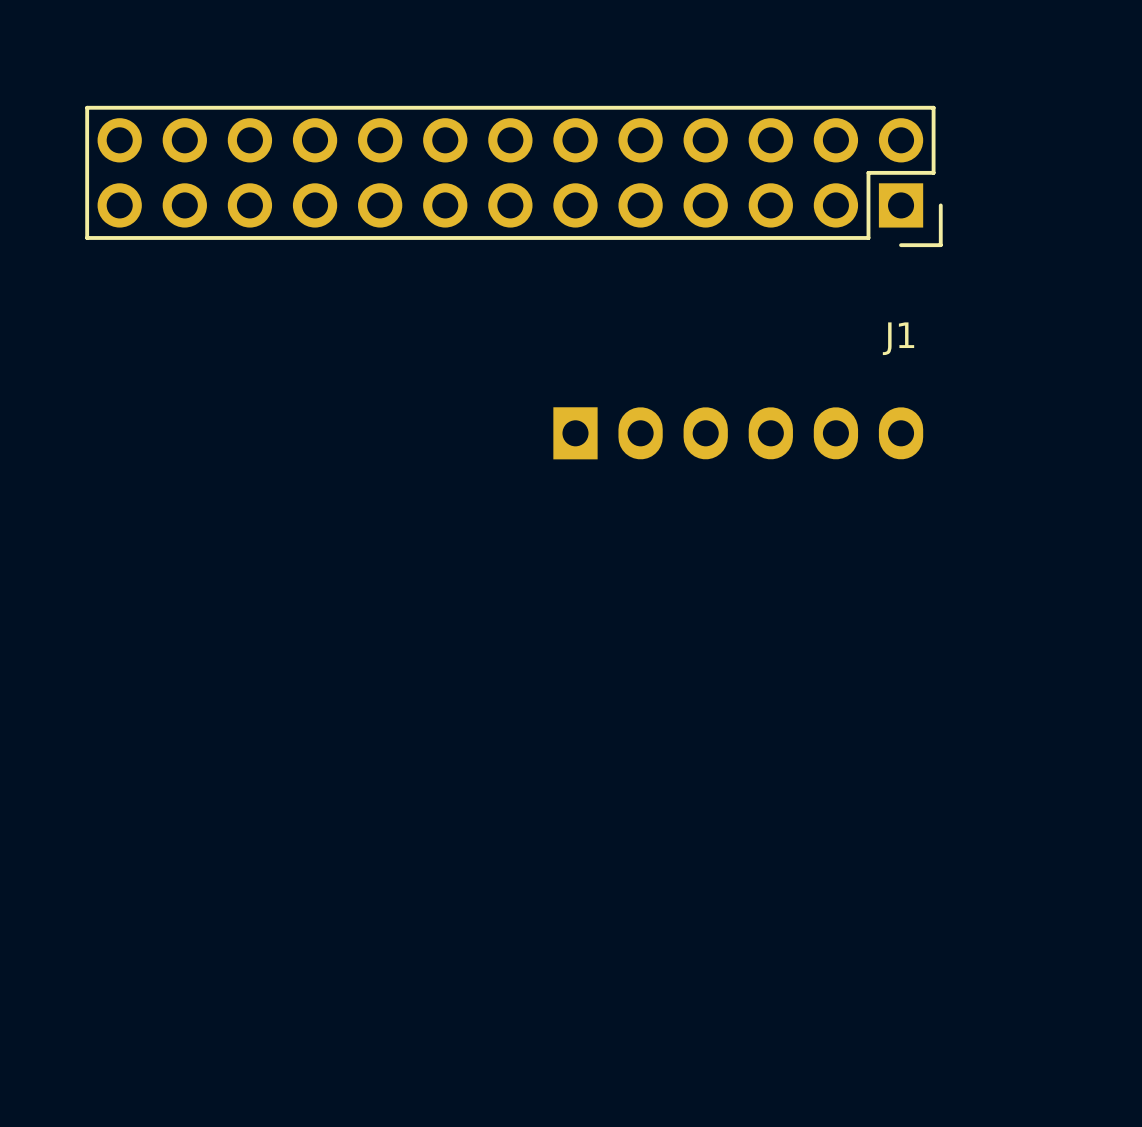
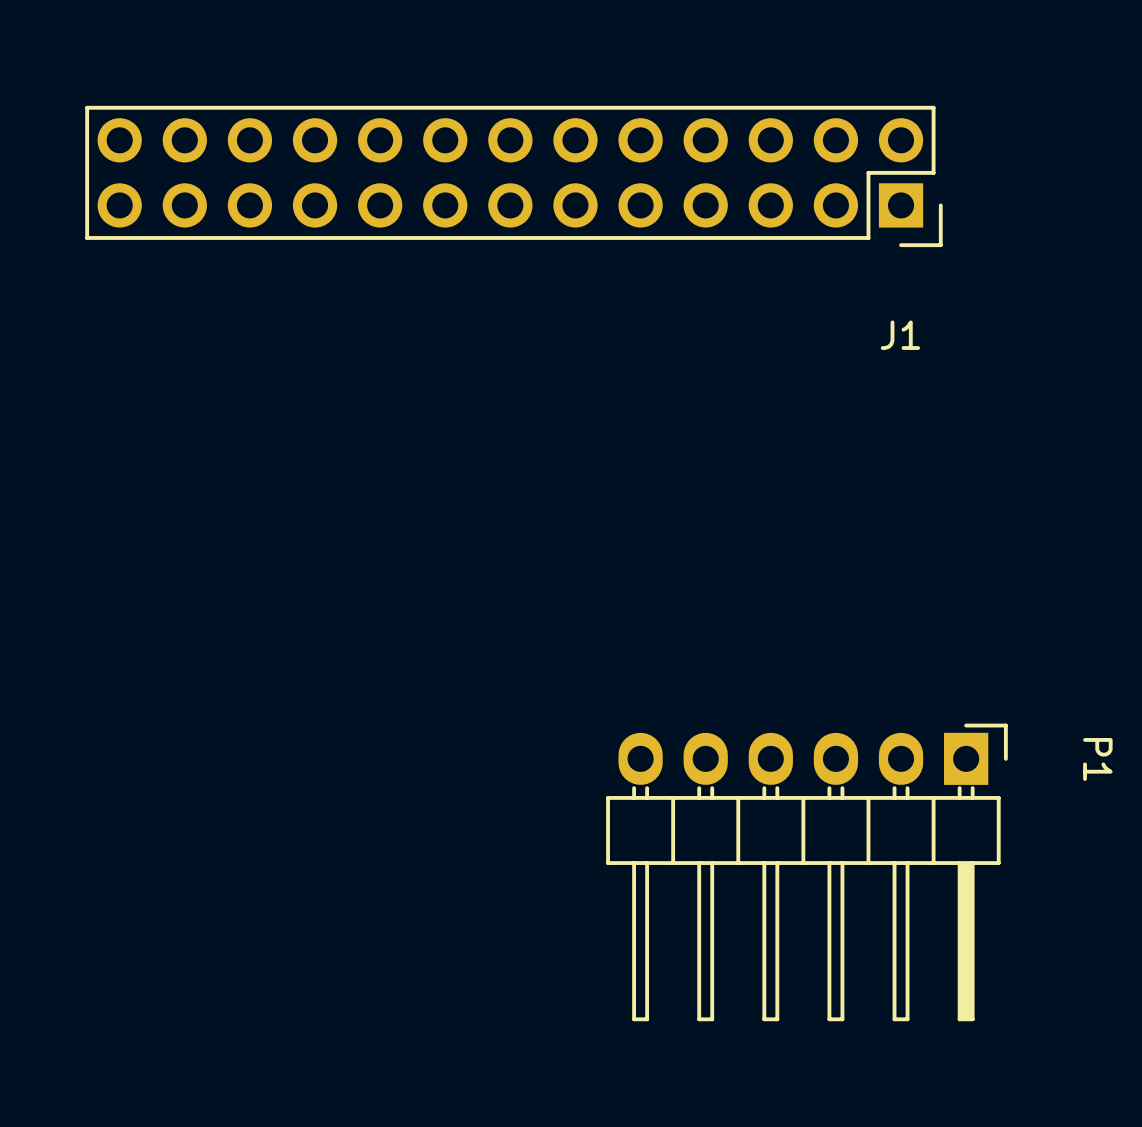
P1 side: top (738, 433) -> bottom (806, 872)

